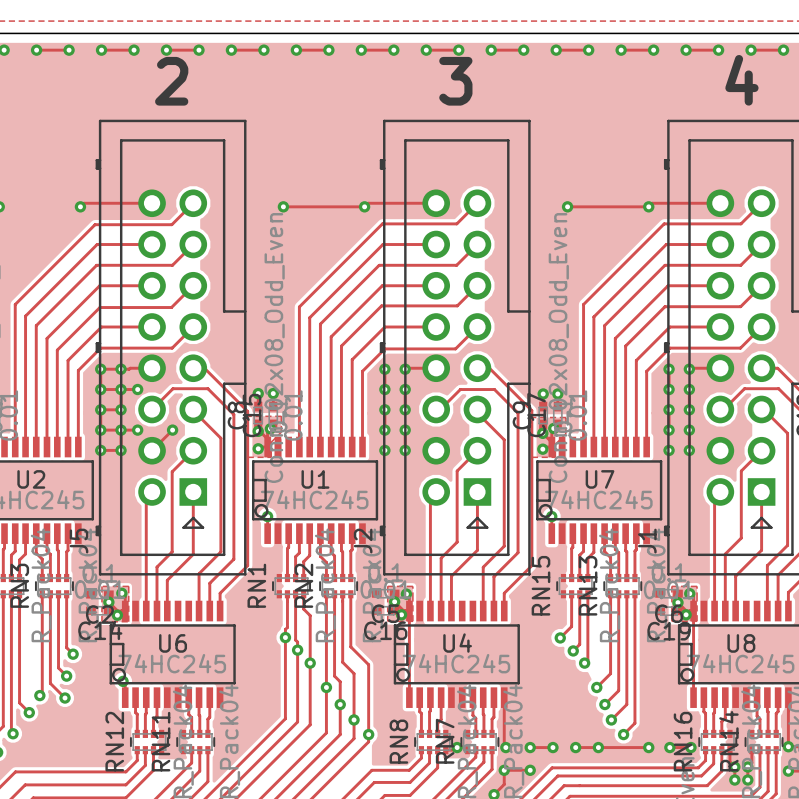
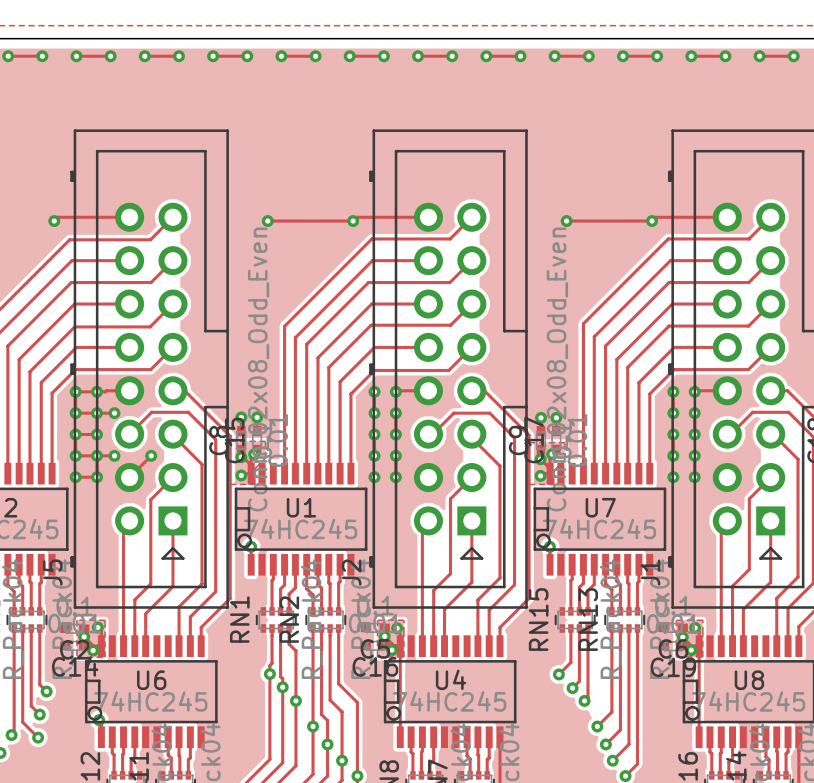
text: 4 (741, 80) -> none
text: 2 (171, 81) -> none
text: 3 (455, 81) -> none

